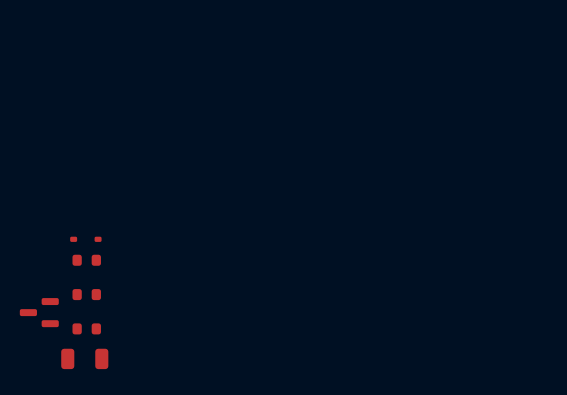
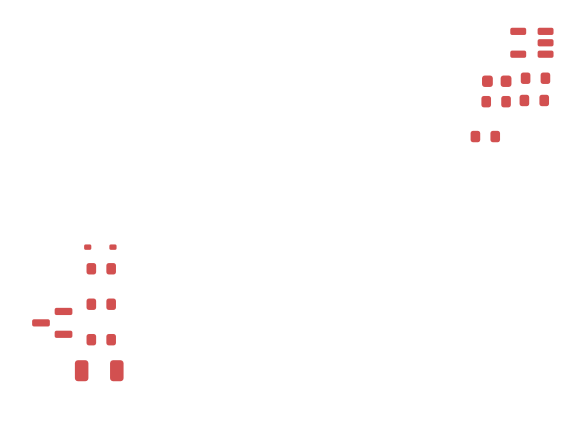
part: none -> (531, 42)
part: none -> (535, 78)
part: none -> (496, 81)
part: none -> (534, 100)
part: none -> (496, 101)
part: none -> (485, 136)

